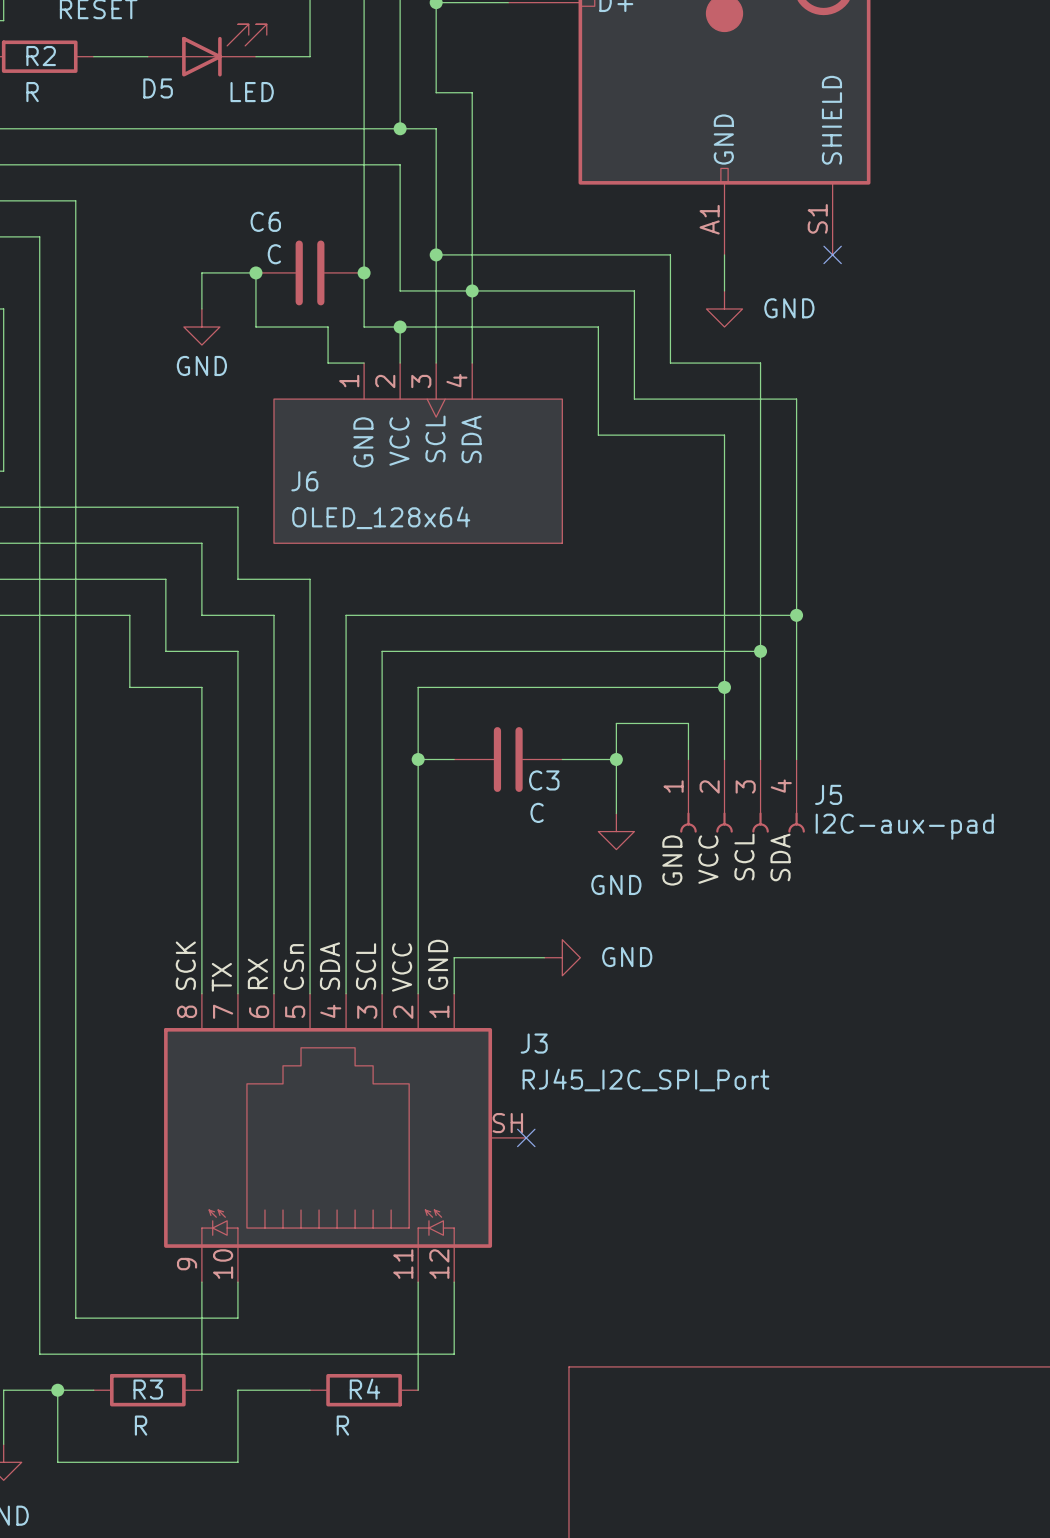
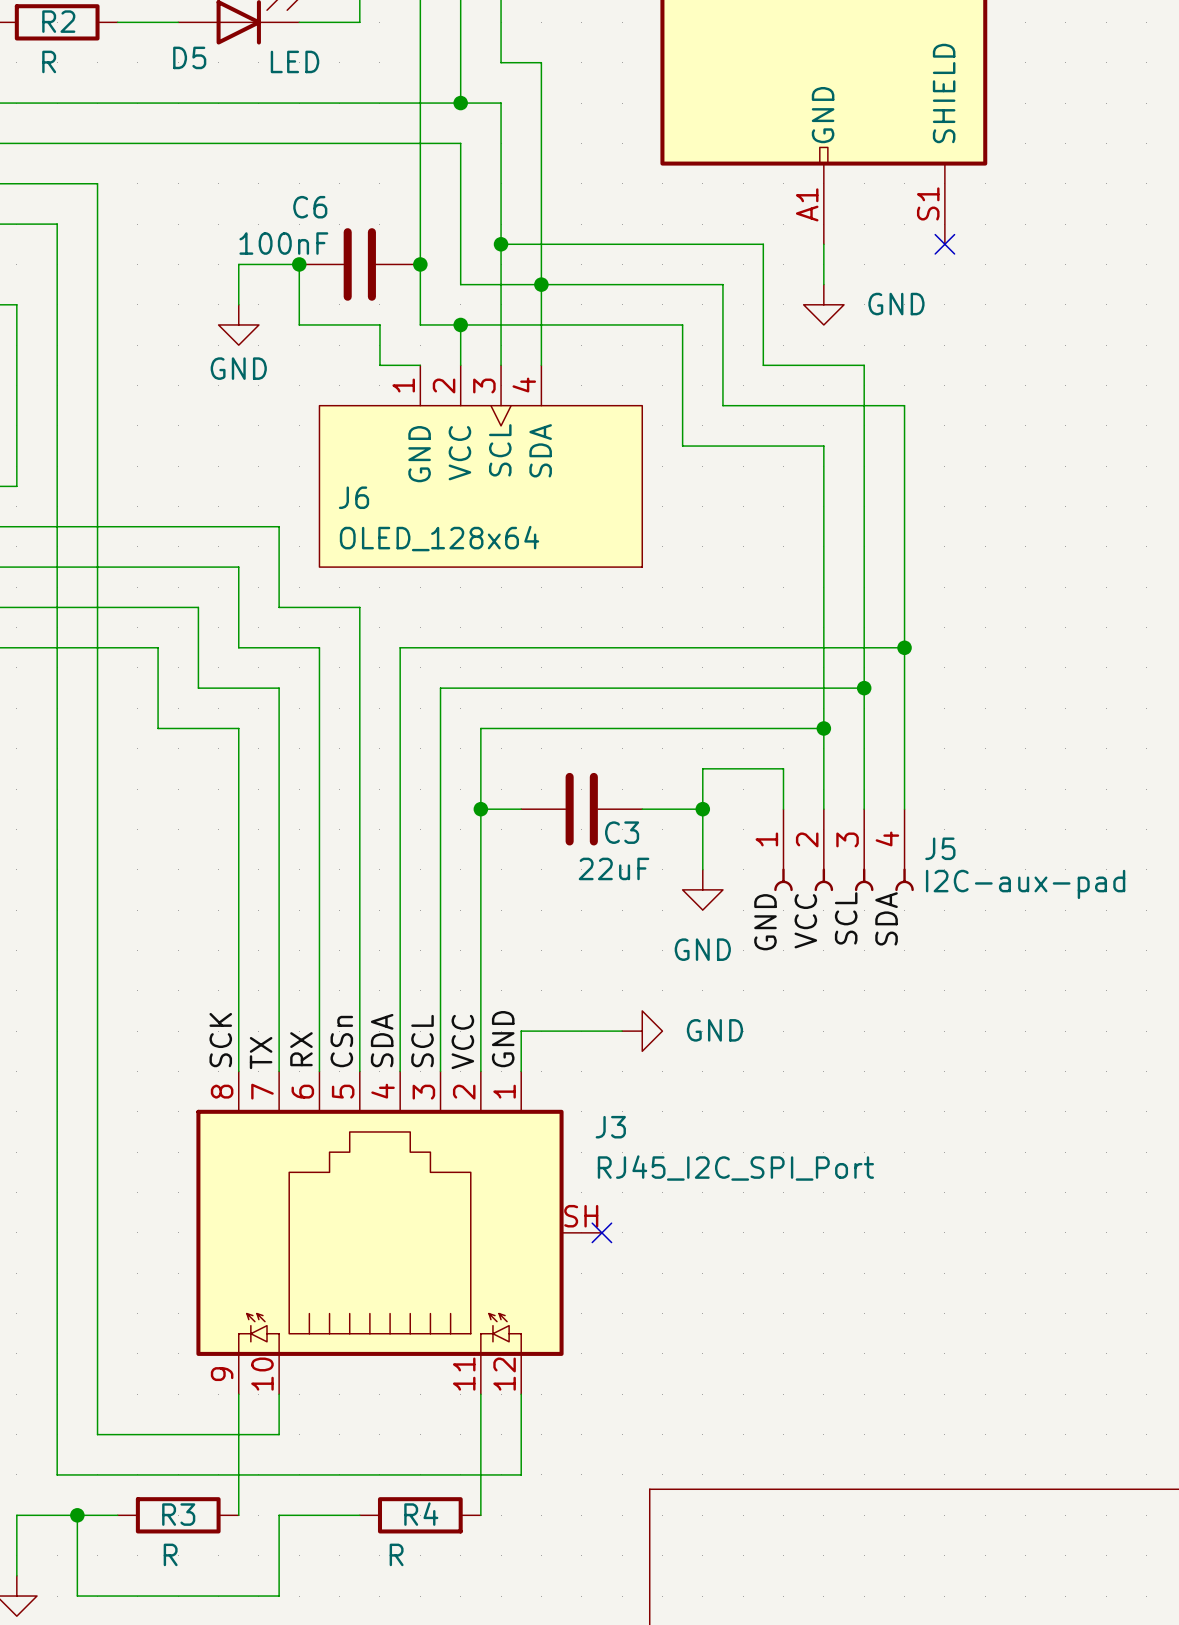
C6 value: C (274, 254) -> 100nF (283, 243)
C3 value: C (537, 812) -> 22uF (614, 868)

